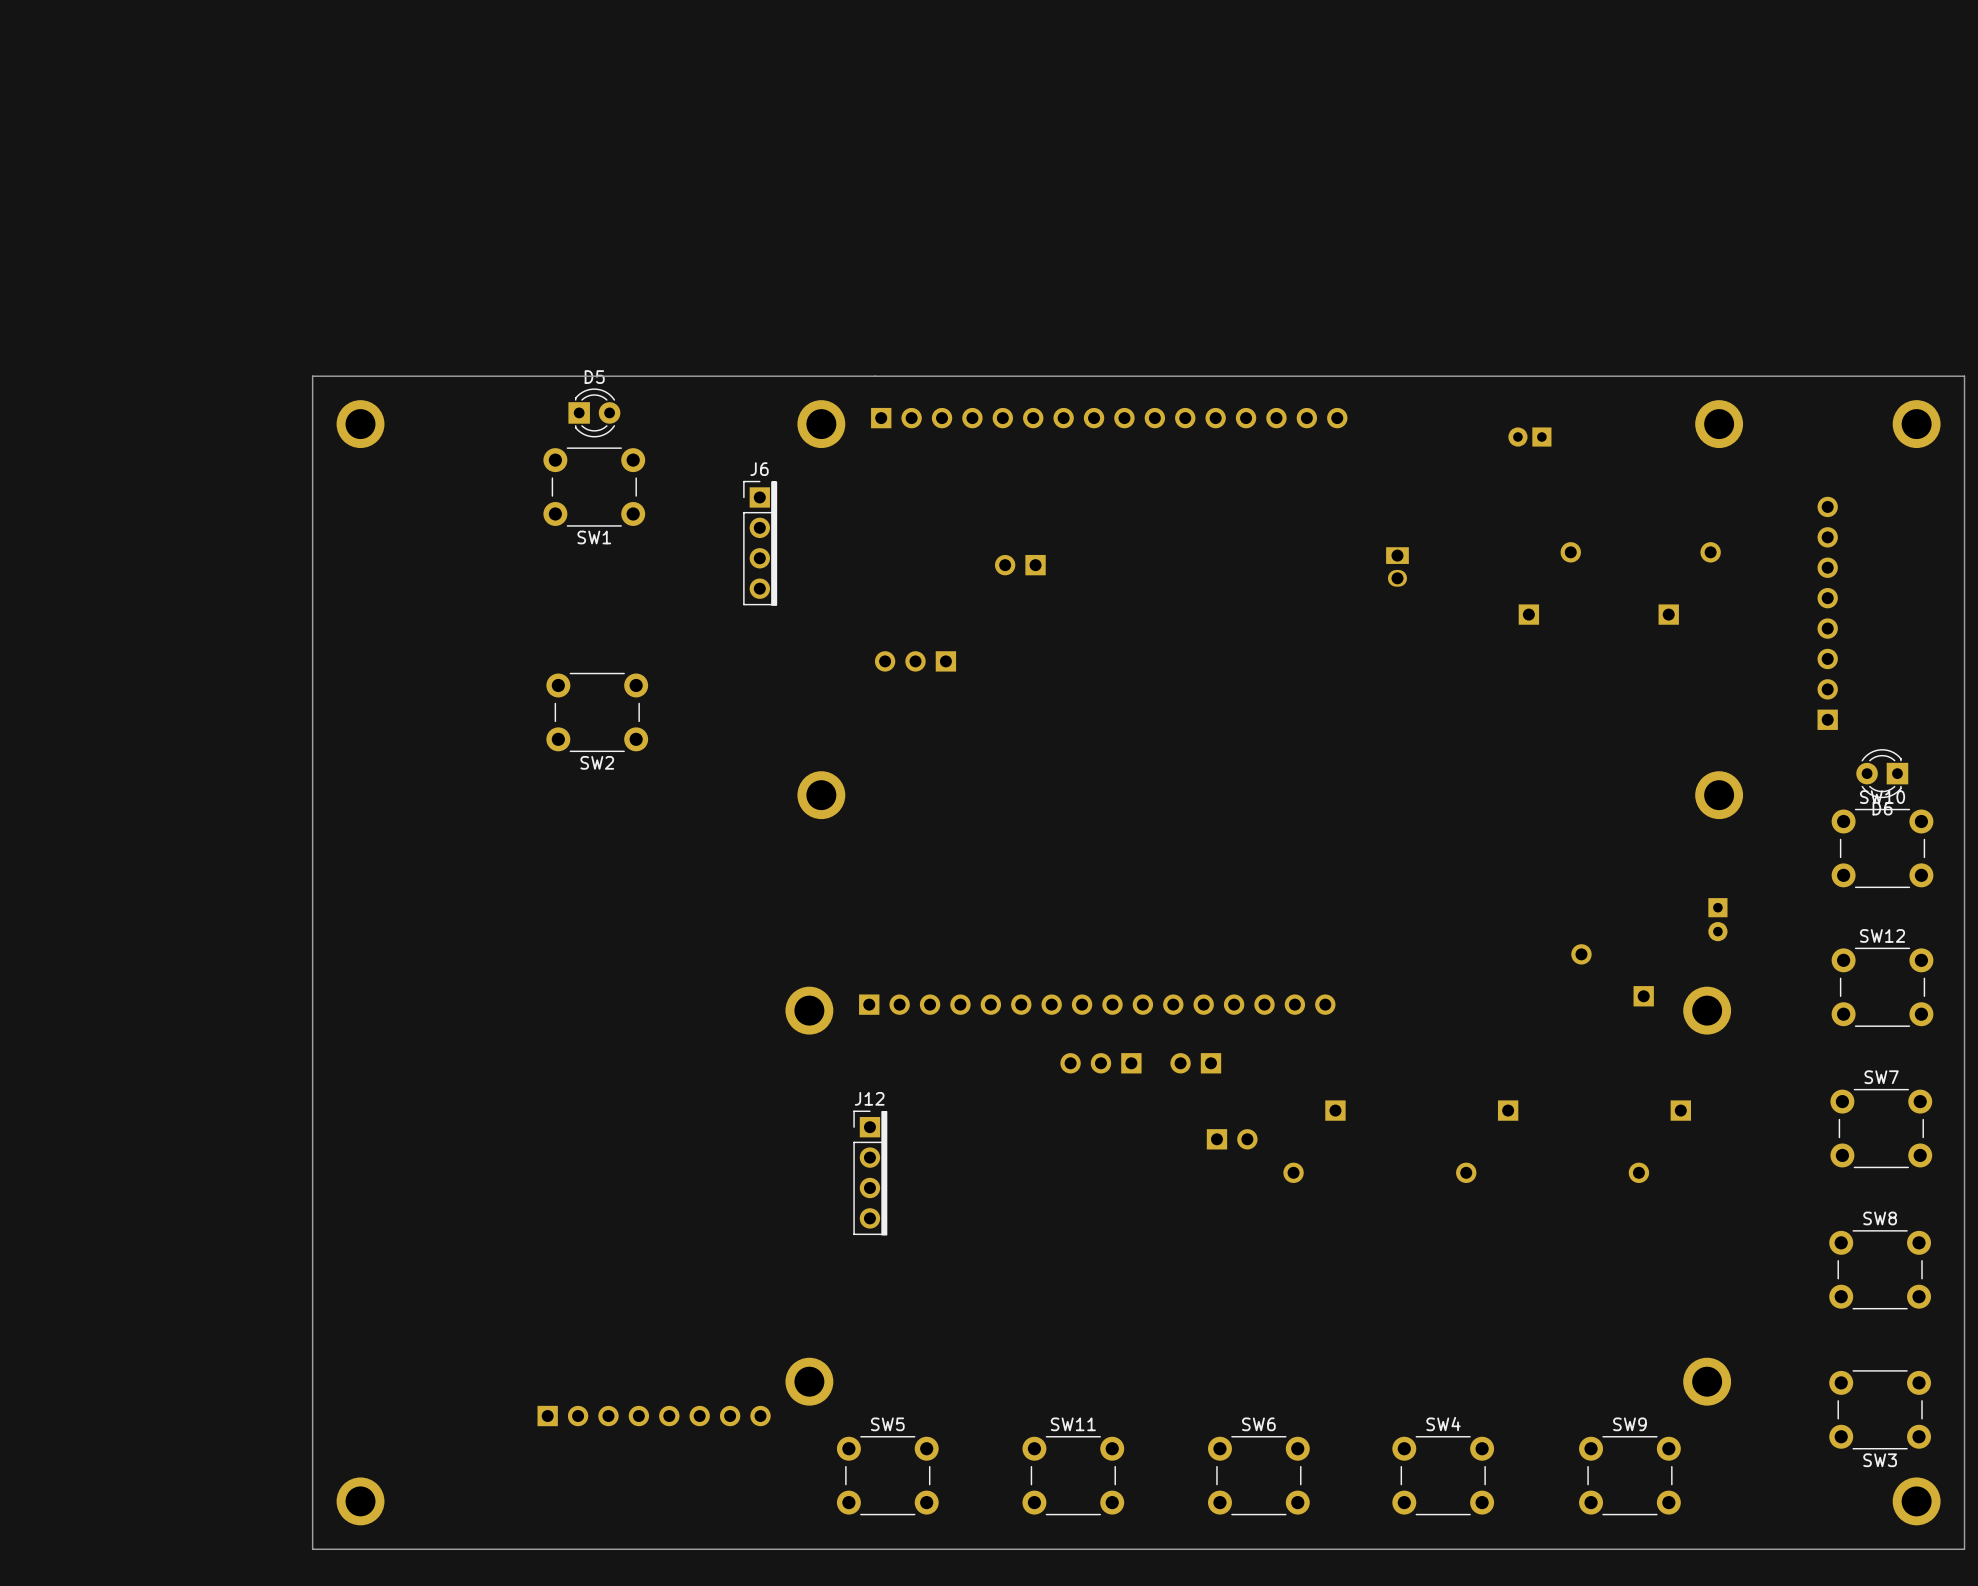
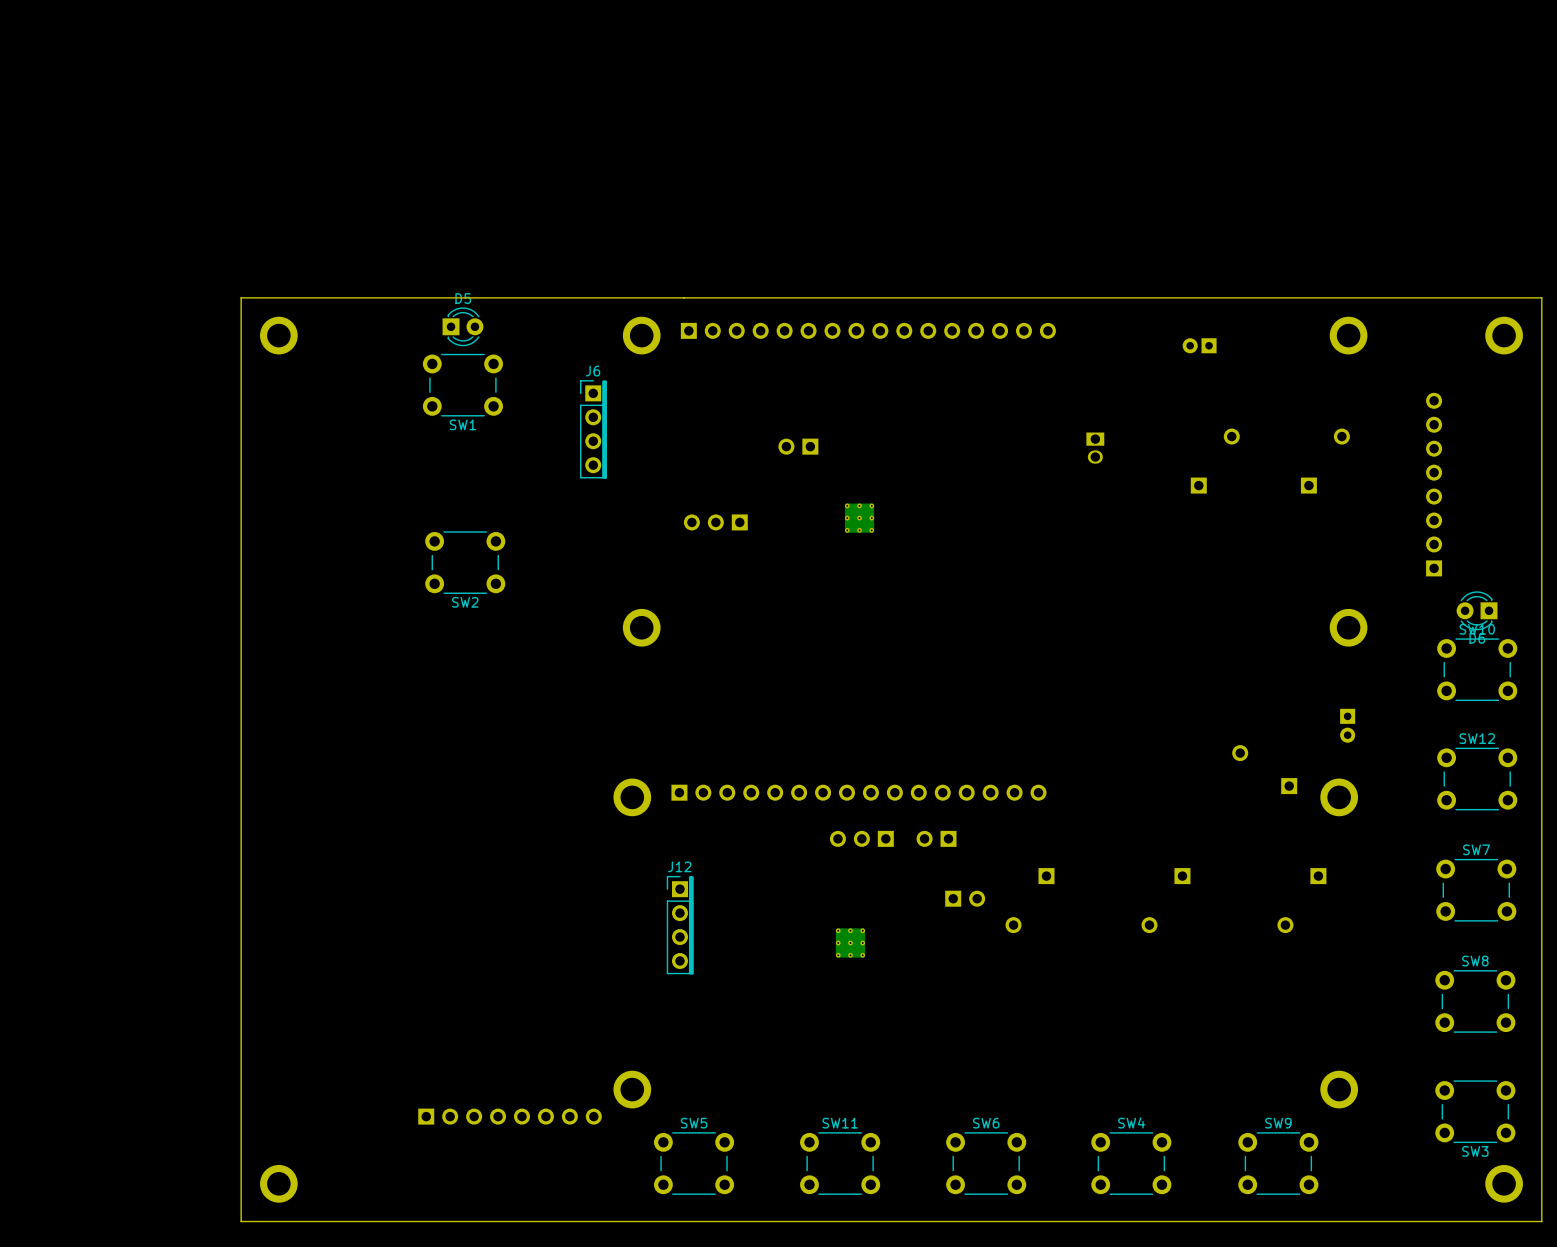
part: none -> (859, 518)
part: none -> (850, 943)

